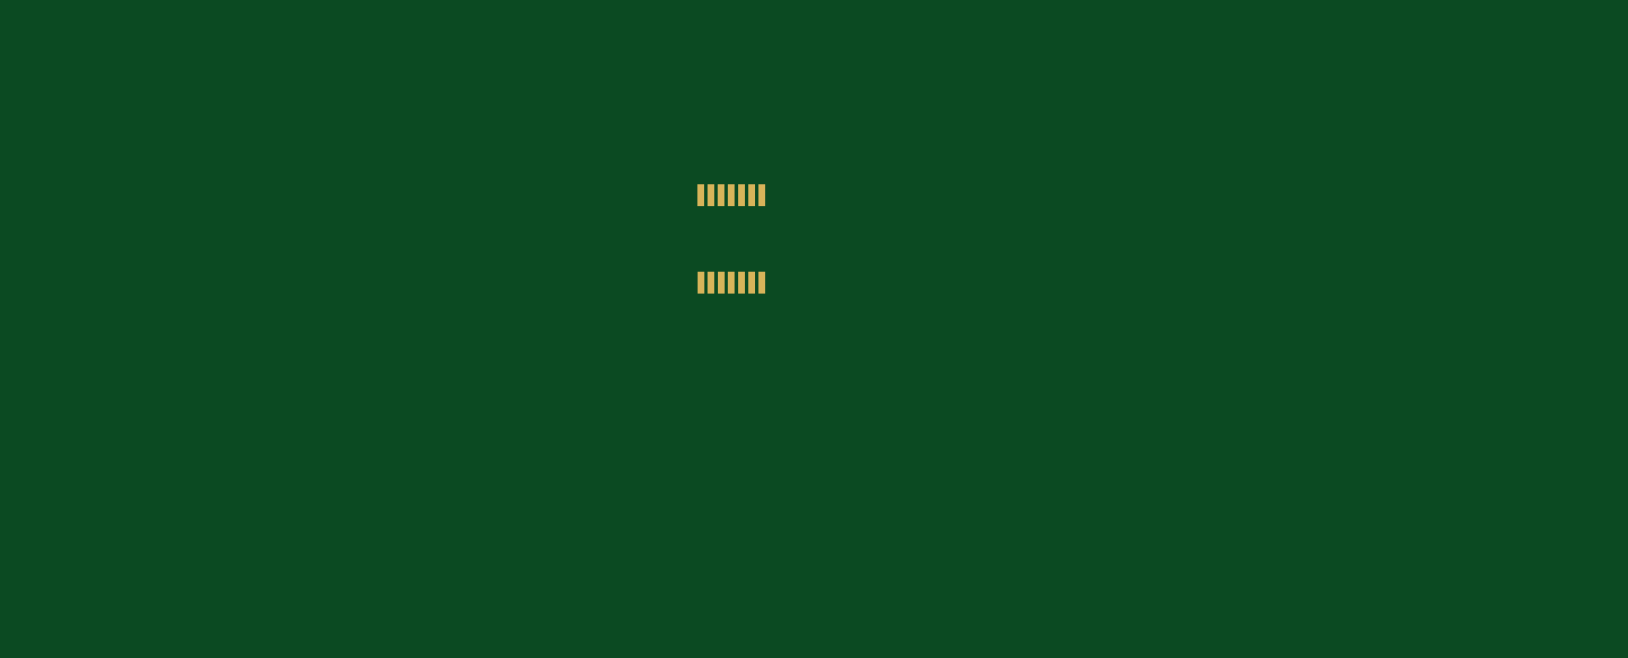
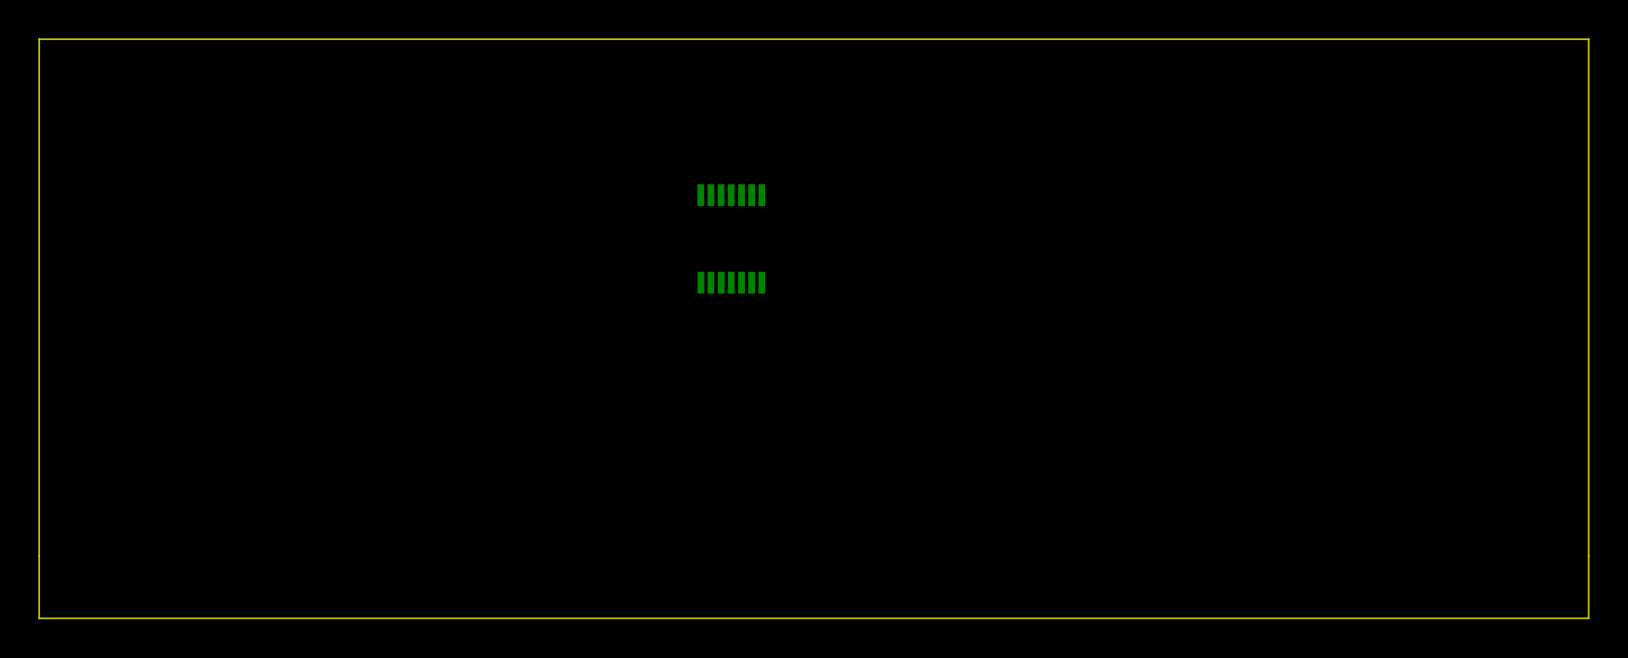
board edge: none -> (1588, 39) (1588, 618) (39, 618) (39, 39) (1588, 39)

